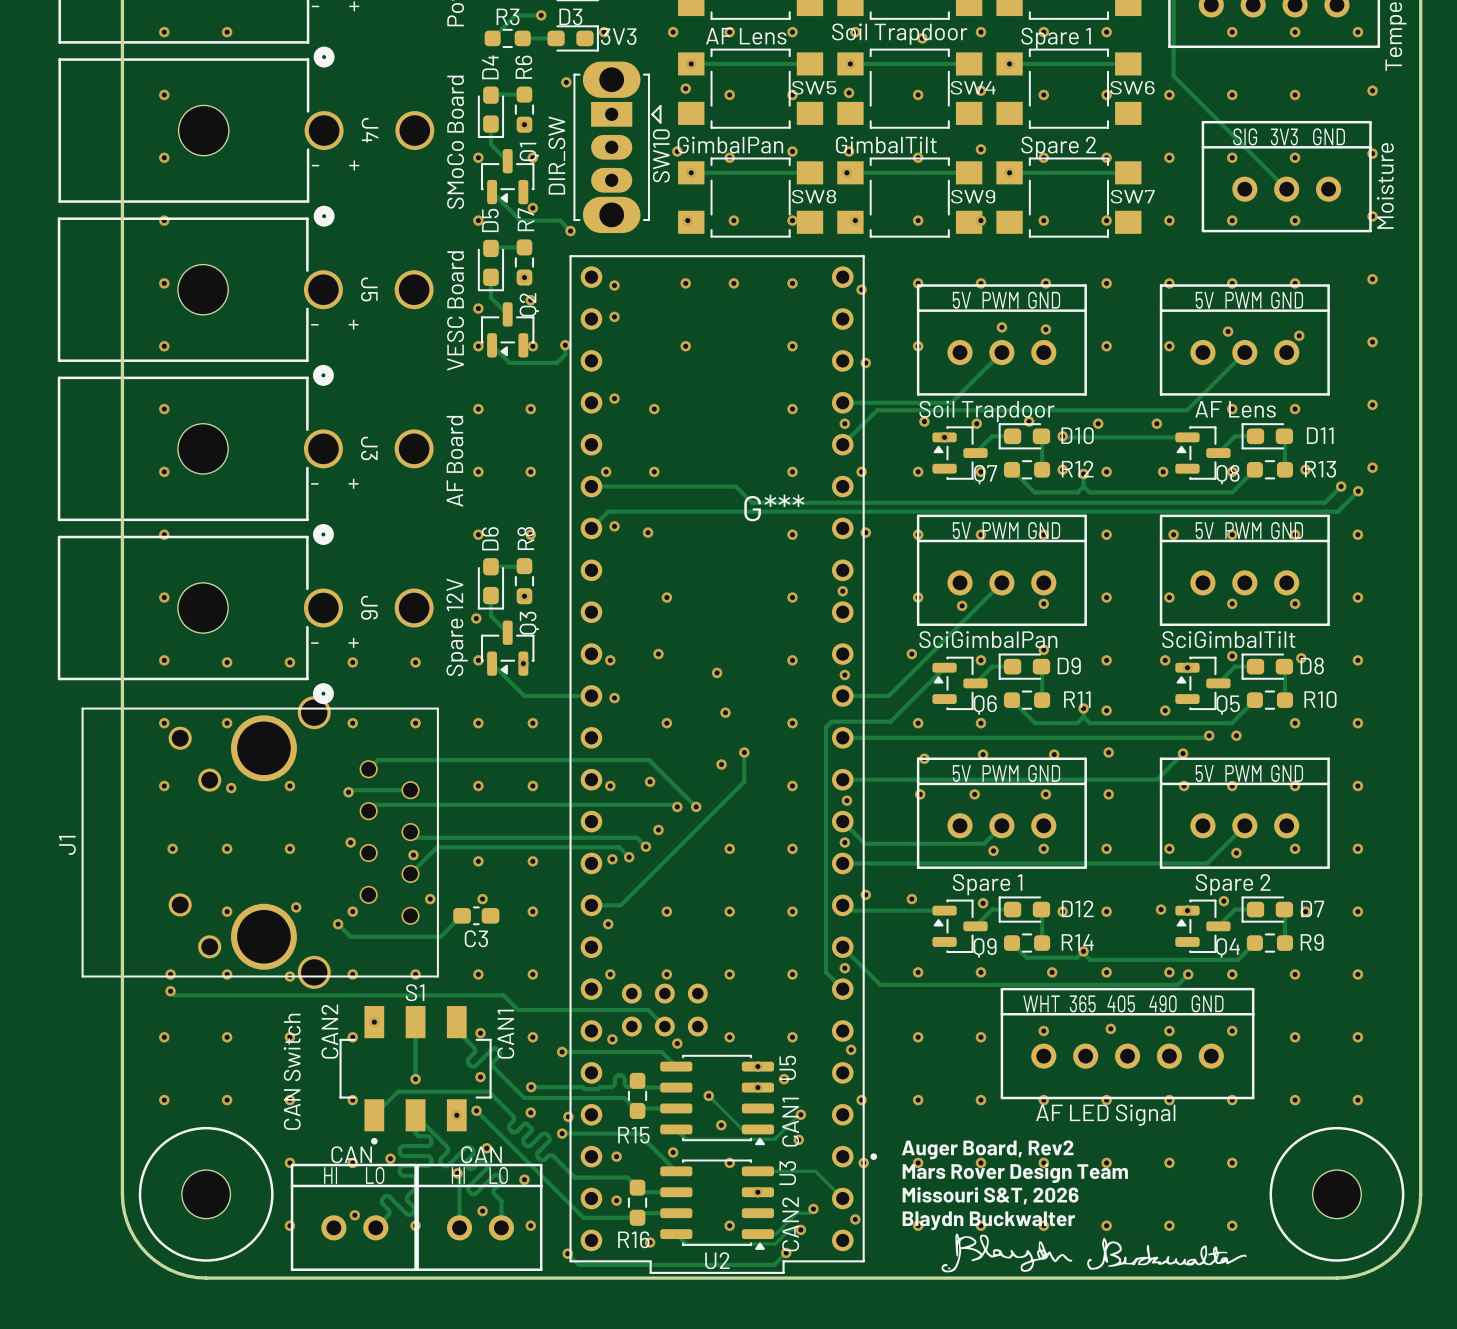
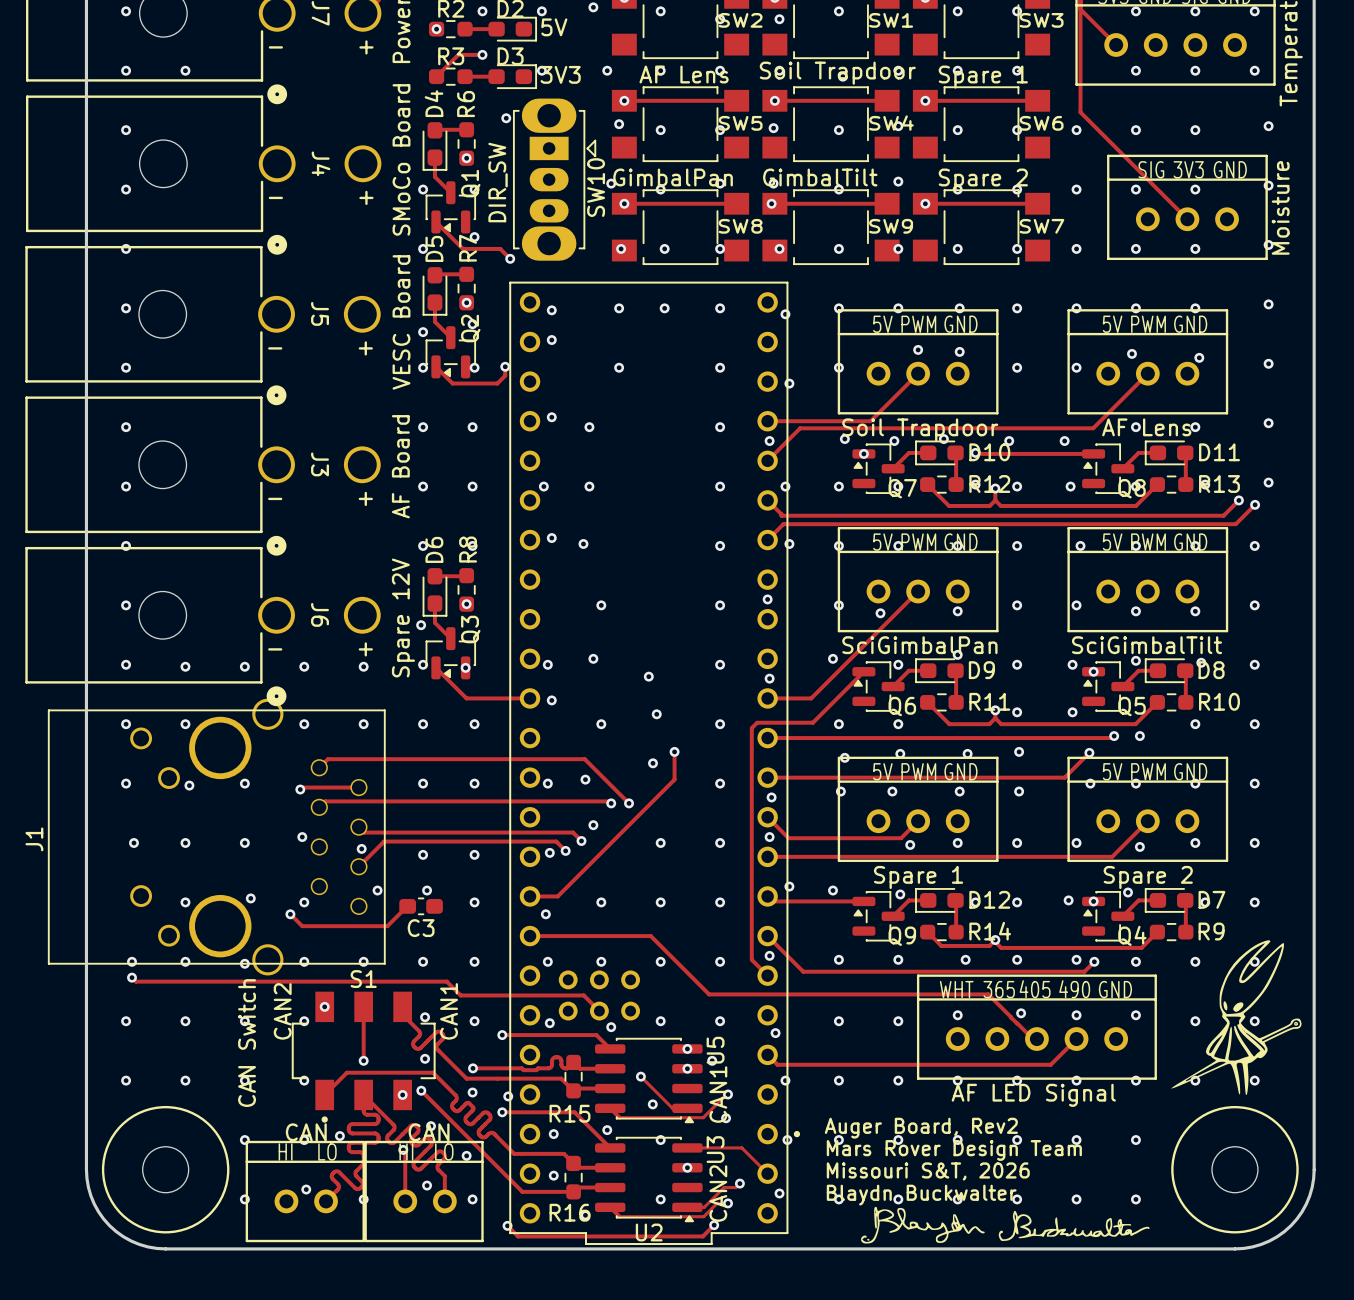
track: (591, 486) (735, 486) (752, 502) (857, 502) -> (767, 500) (781, 515)
G***: (774, 507) -> none
track: (859, 511) (608, 511) (591, 528) -> (783, 524) (767, 540)
track: none -> (530, 936) (650, 936) (709, 994) (988, 994) (1032, 1039) (1036, 1039)
drawing: none -> [1171, 940, 1302, 1096]
track: none -> (1076, 1039) (1050, 1064) (777, 1064) (767, 1054)

